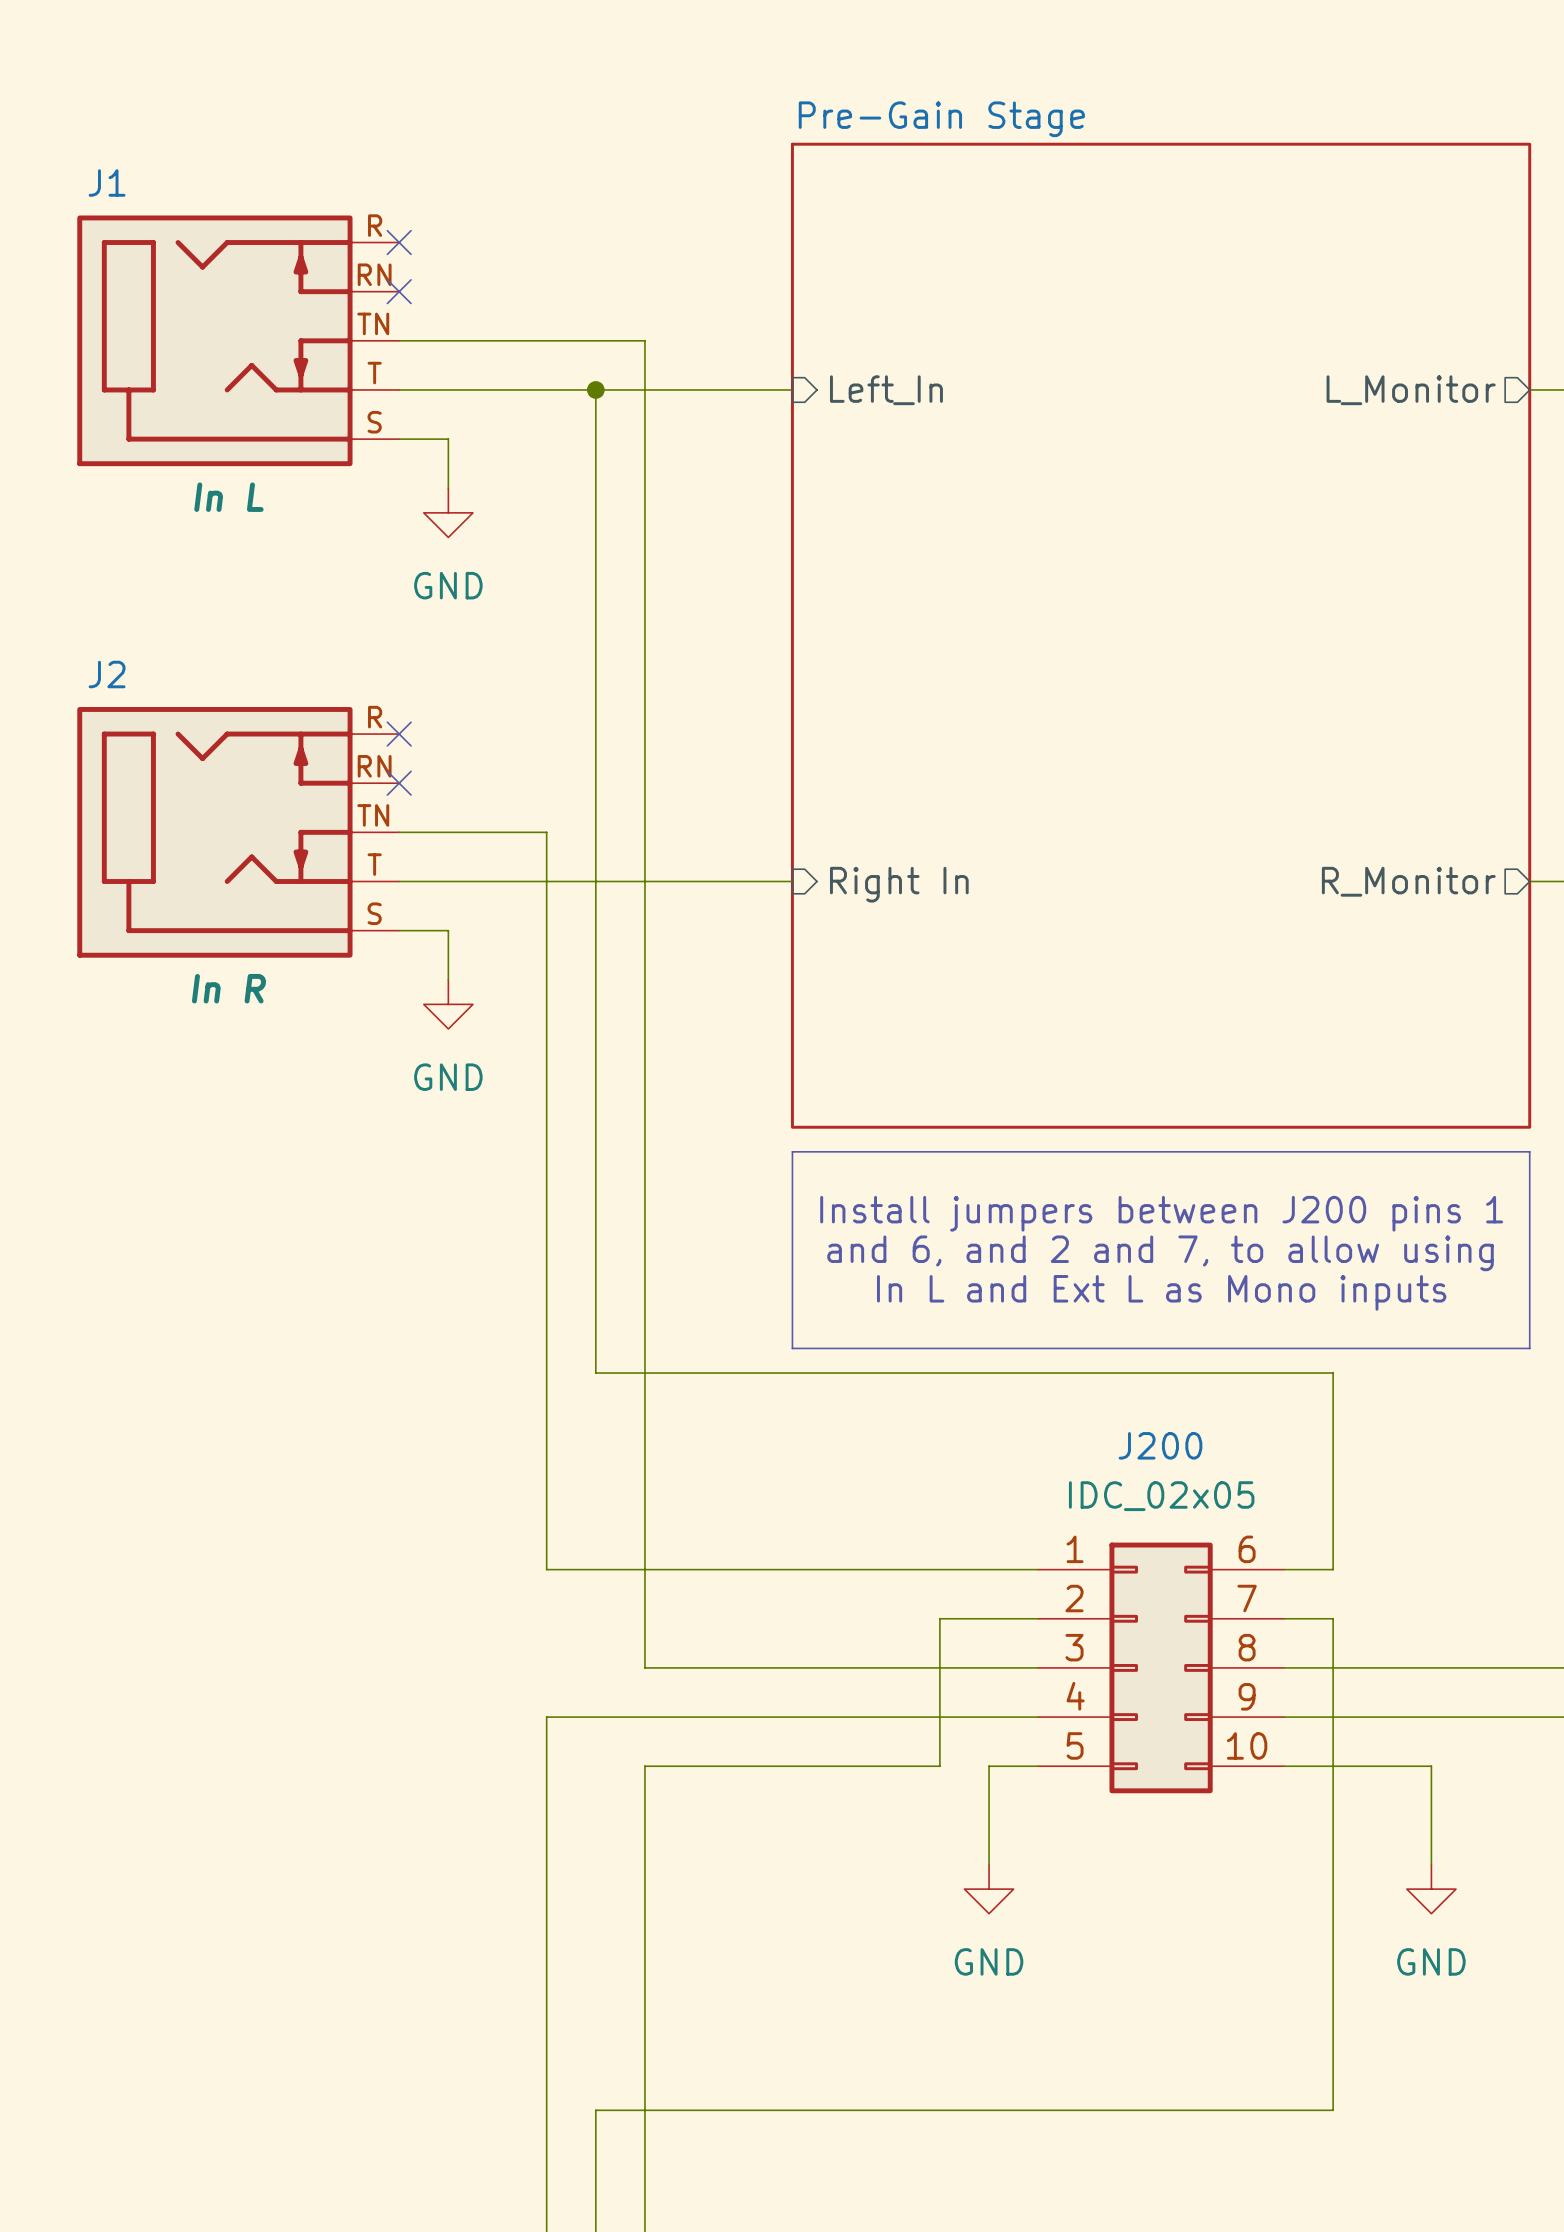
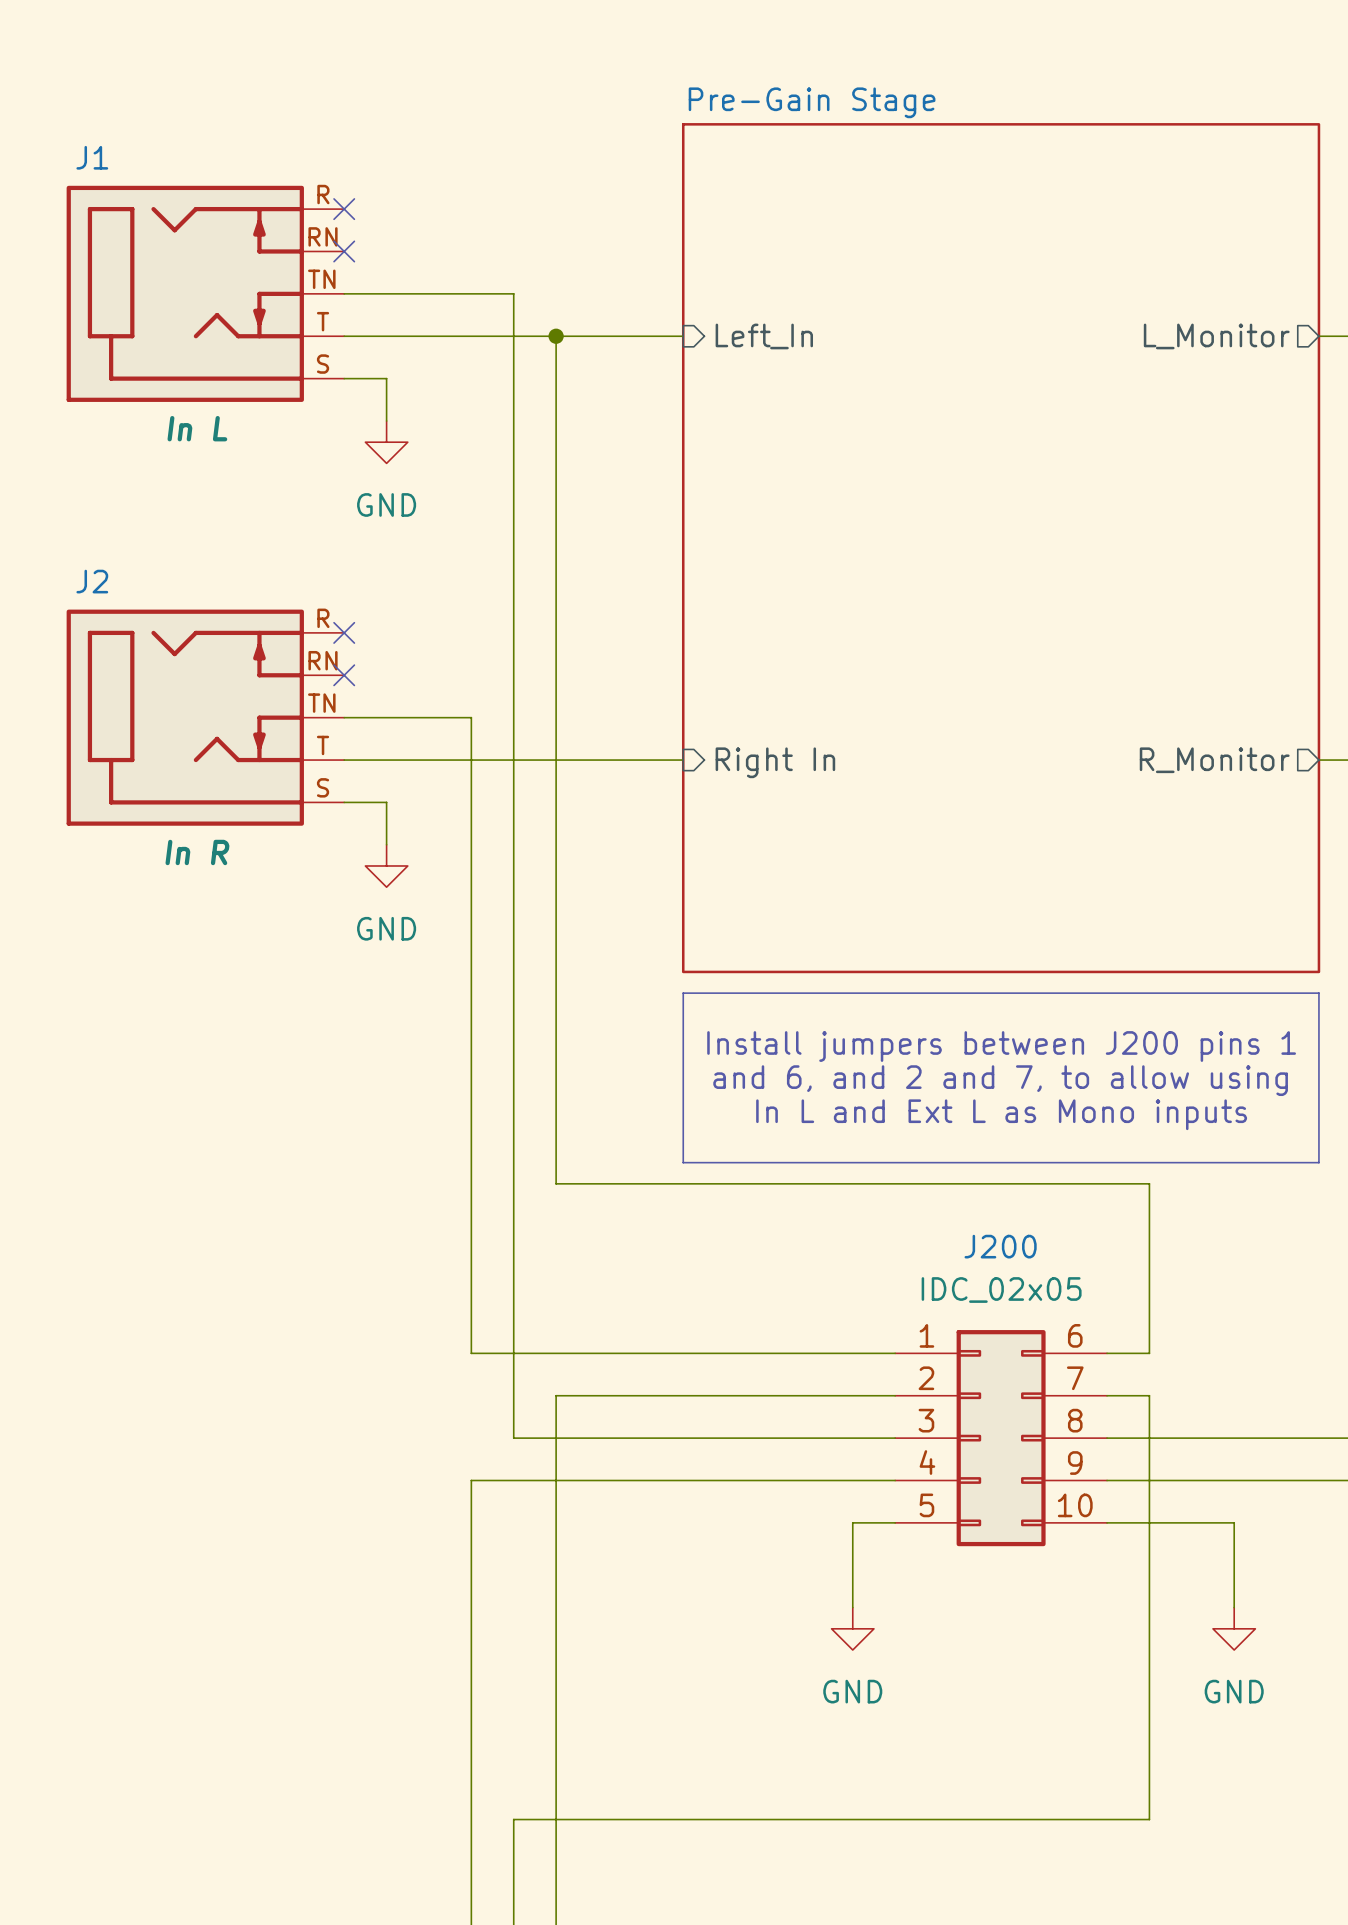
wire: (595, 340) (644, 340) (644, 389) -> (513, 293) (513, 336)
junction position: (595, 389) -> (556, 336)
wire: (595, 1373) (644, 1373) (644, 1618) -> (513, 1183) (513, 1438) (556, 1438) (556, 1522)
wire: (939, 1618) (939, 1766) (644, 1766) -> (810, 1395) (556, 1395)

